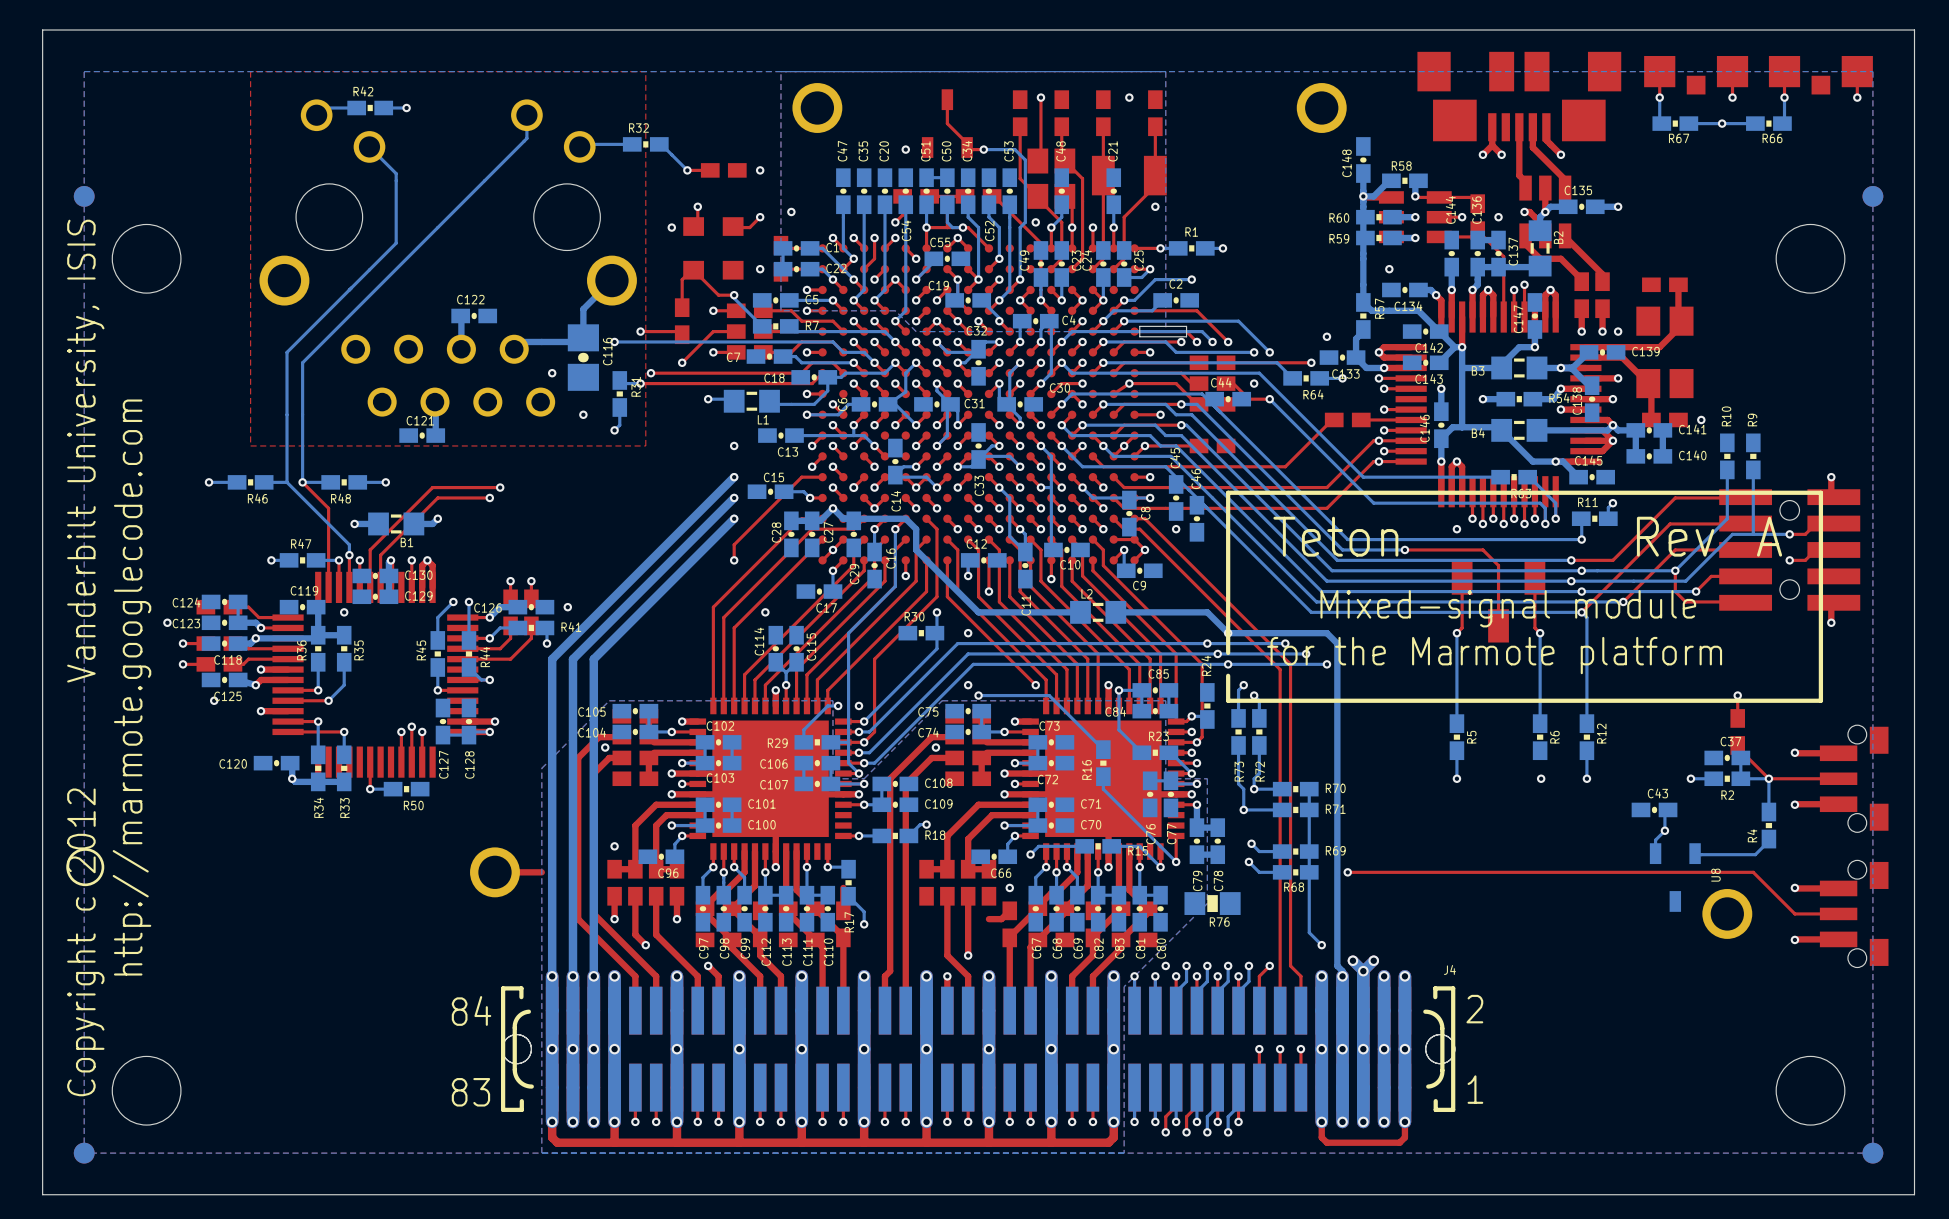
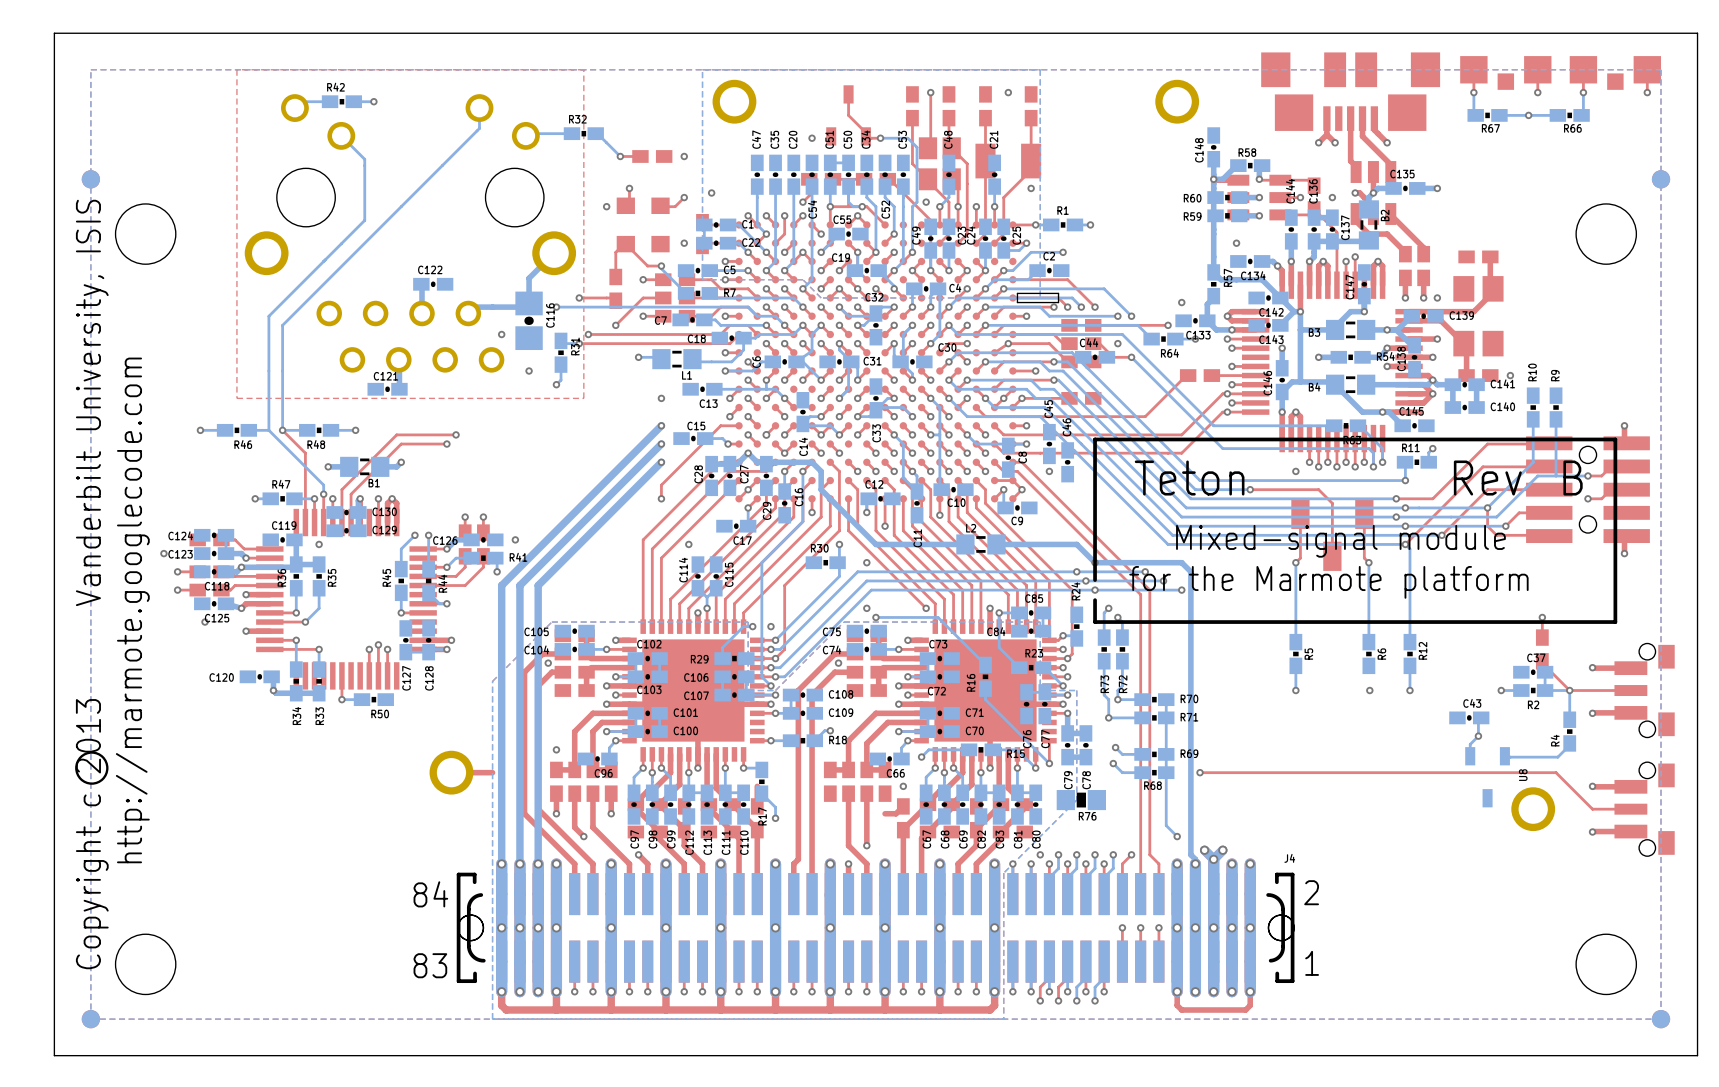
text: A (1769, 536) -> B (1573, 478)
text: Copyright c 2012 (85, 942) -> Copyright c 2013 (92, 834)

